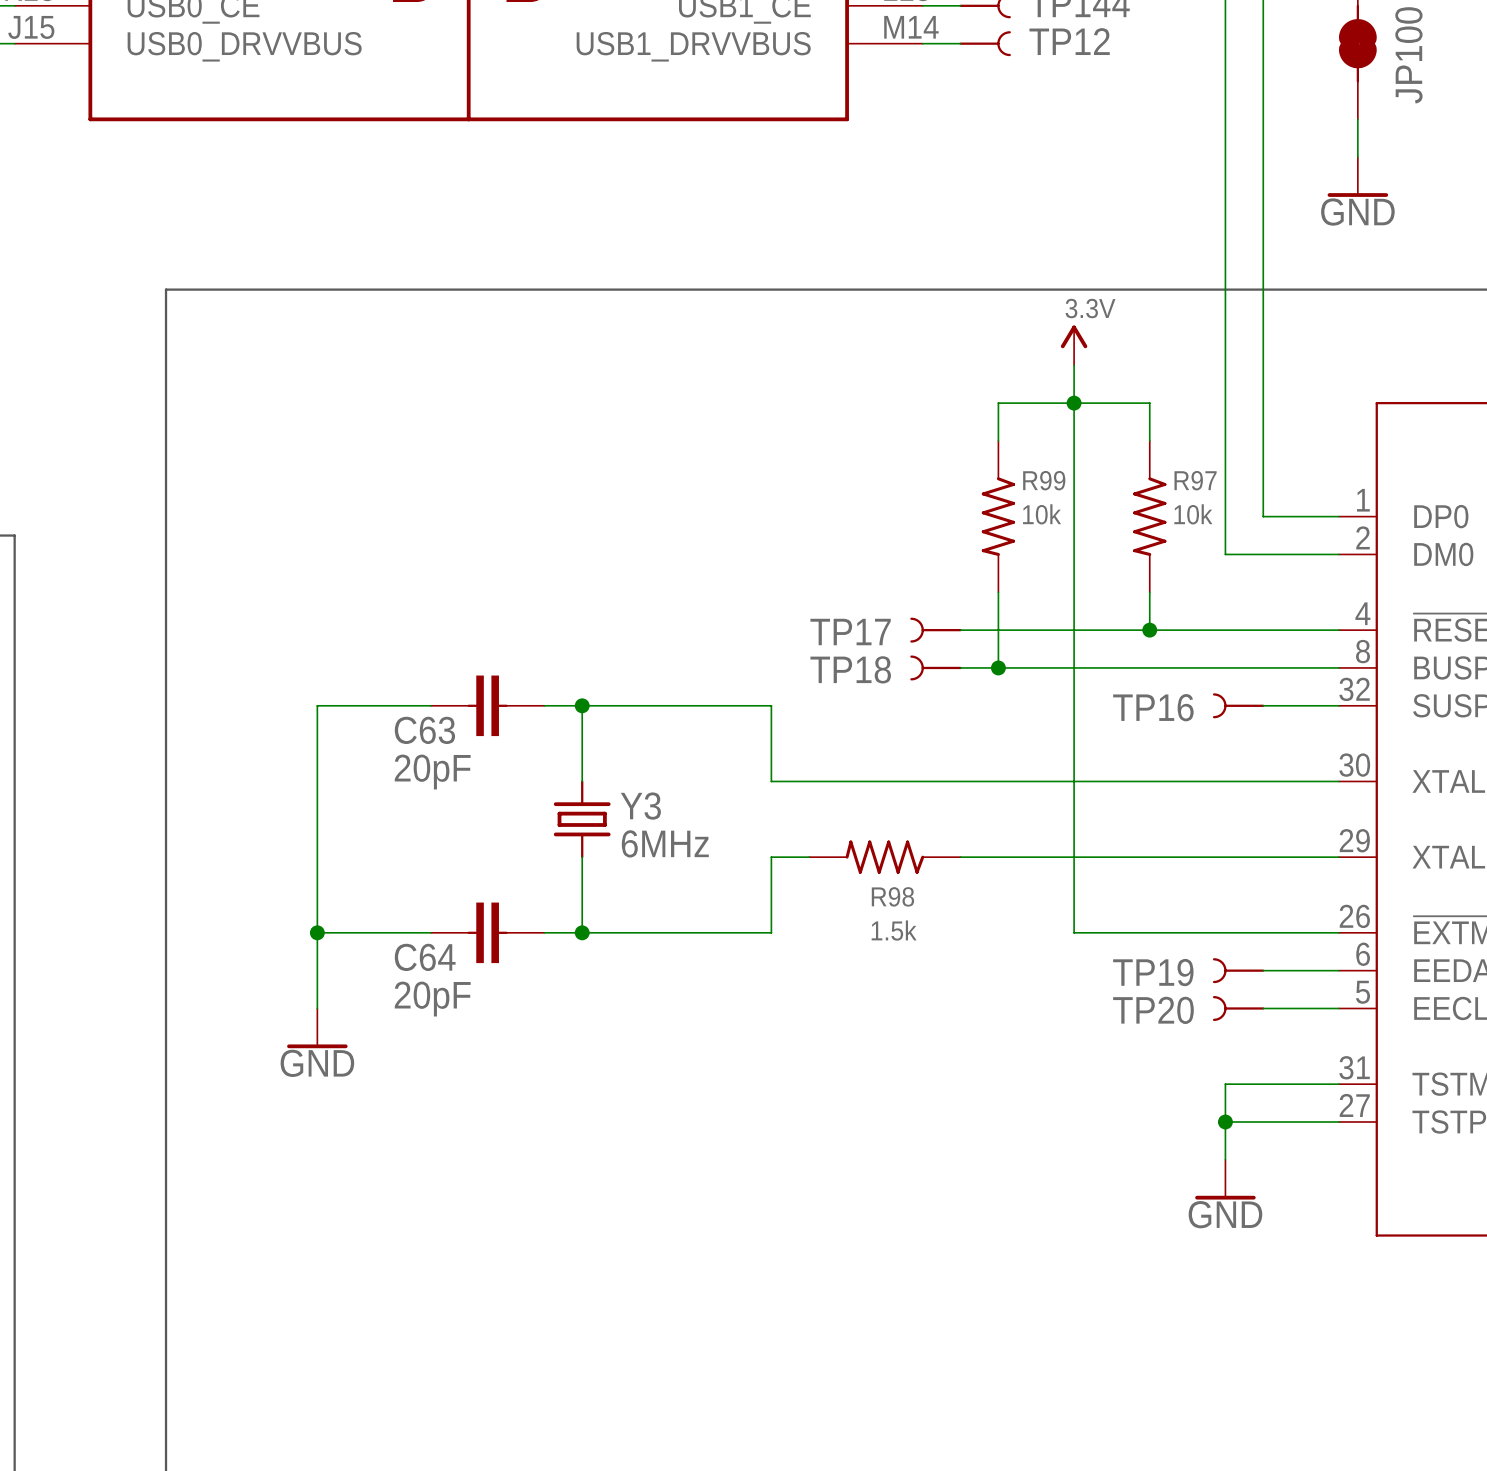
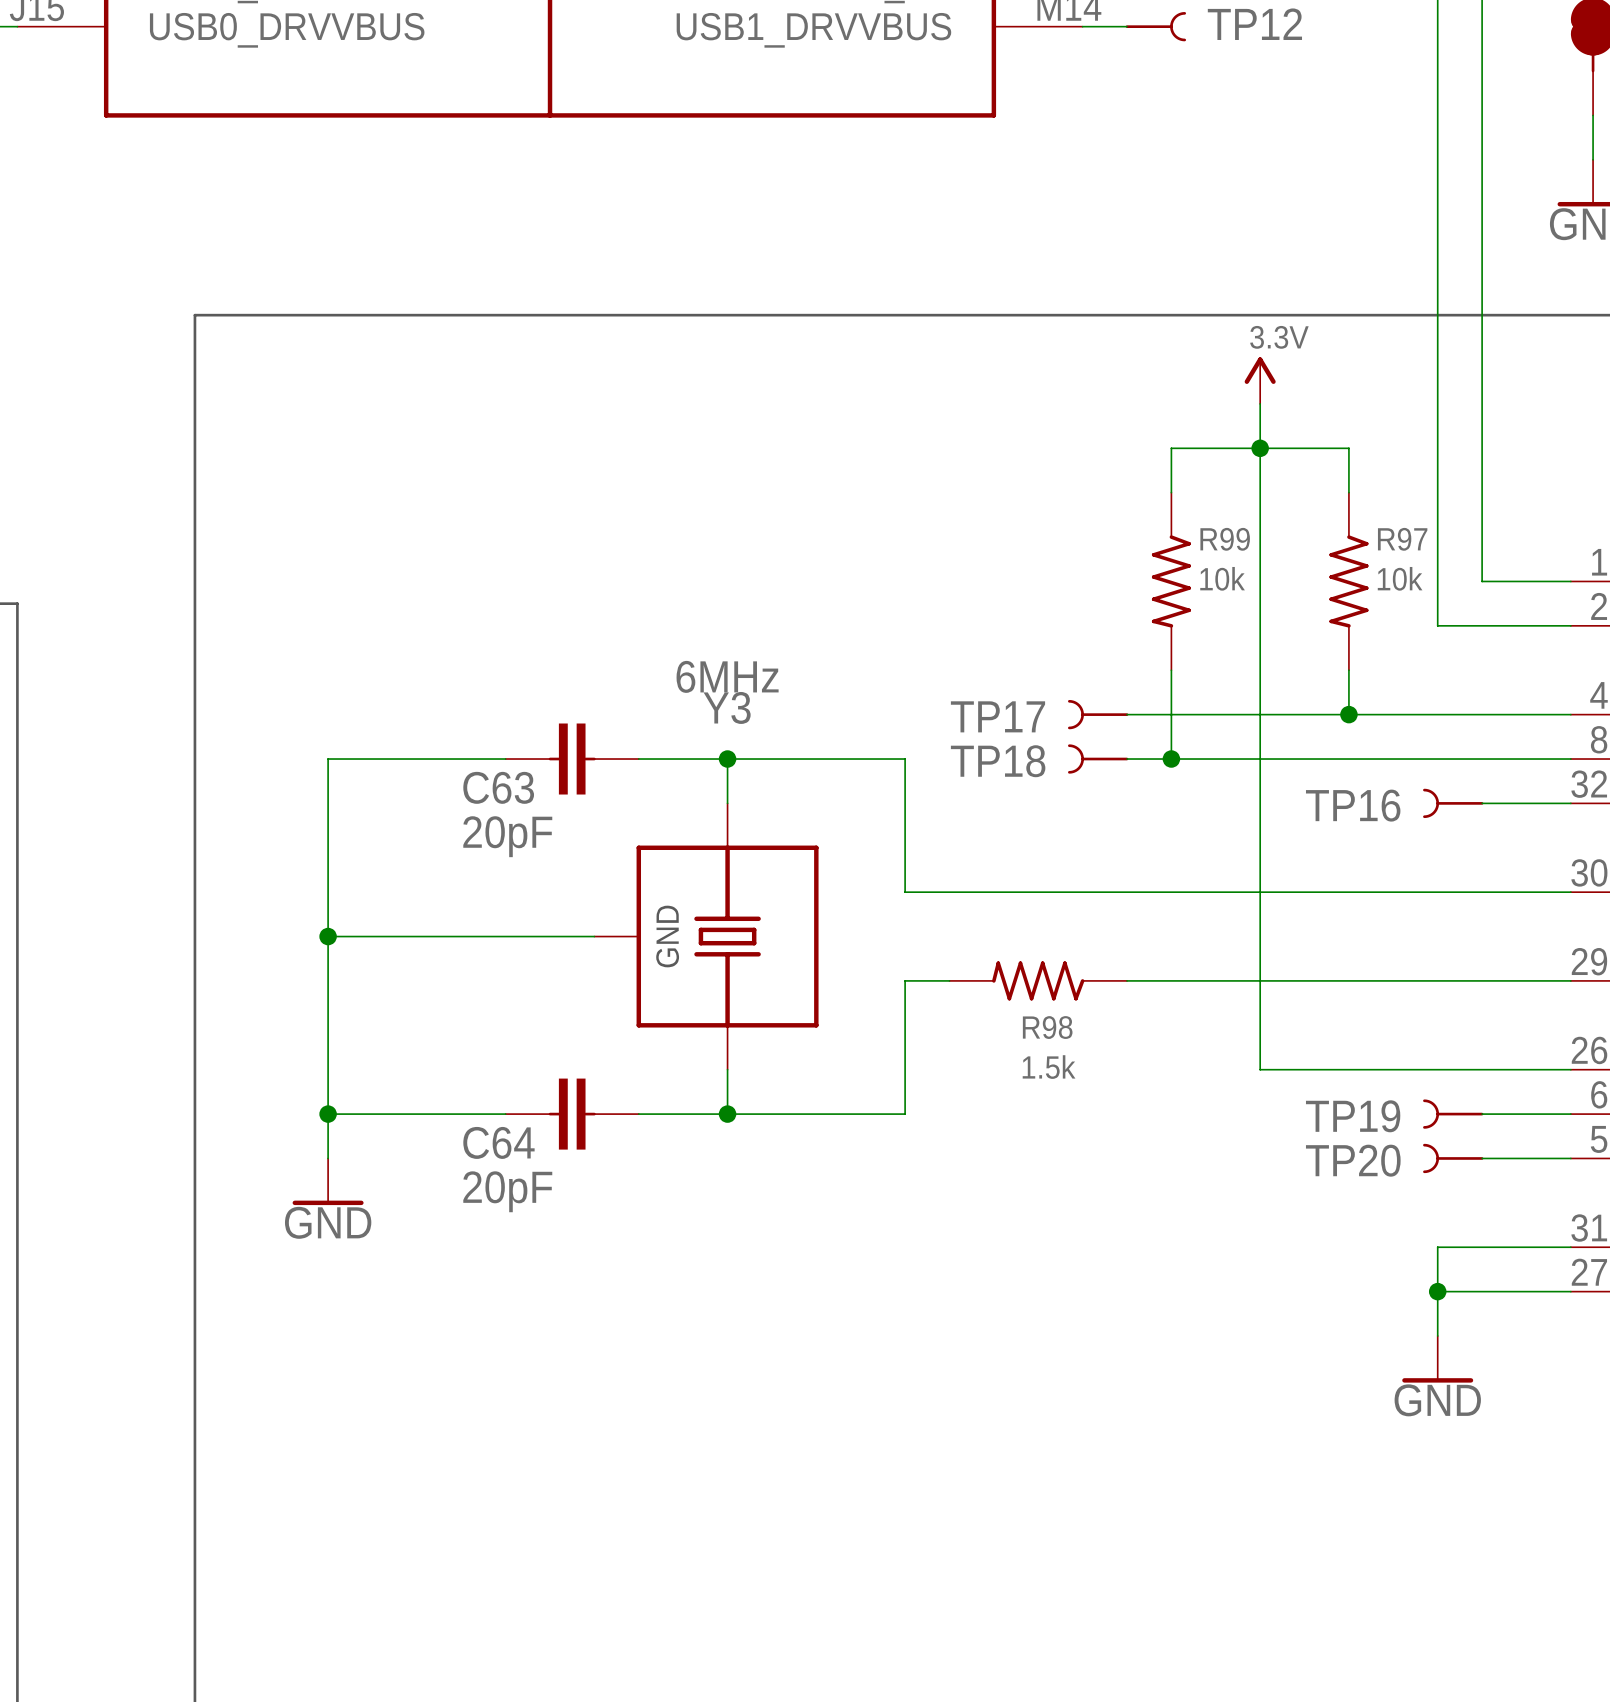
wire: none -> (505, 759) (328, 759) (328, 1158)
wire: none -> (727, 759) (727, 803)
wire: (430, 705) (317, 705) (317, 1008) -> none
C63 position: (487, 705) -> (572, 759)
wire: (544, 705) (771, 705) -> (638, 759) (905, 759) (905, 803)
wire: (582, 705) (582, 781) -> none
junction position: (582, 705) -> (727, 759)
Y3 symbol: [553, 780, 611, 859] -> [594, 803, 819, 1070]
Y3 name position: Y3 (640, 806) -> Y3 (727, 707)
wire: none -> (328, 936) (594, 936)
junction: none -> (328, 936)
Y3 value position: 6MHz (665, 843) -> 6MHz (727, 676)
wire: (582, 857) (582, 932) -> none
wire: (317, 932) (430, 932) -> none
junction position: (317, 932) -> (328, 1114)
C64 position: (487, 932) -> (572, 1114)
wire: (544, 932) (771, 932) -> (638, 1114) (905, 1114) (905, 1069)
junction position: (582, 932) -> (727, 1114)
wire: none -> (727, 1069) (727, 1114)
wire: none -> (328, 1114) (505, 1114)
power symbol position: GND (317, 1028) -> GND (328, 1181)

